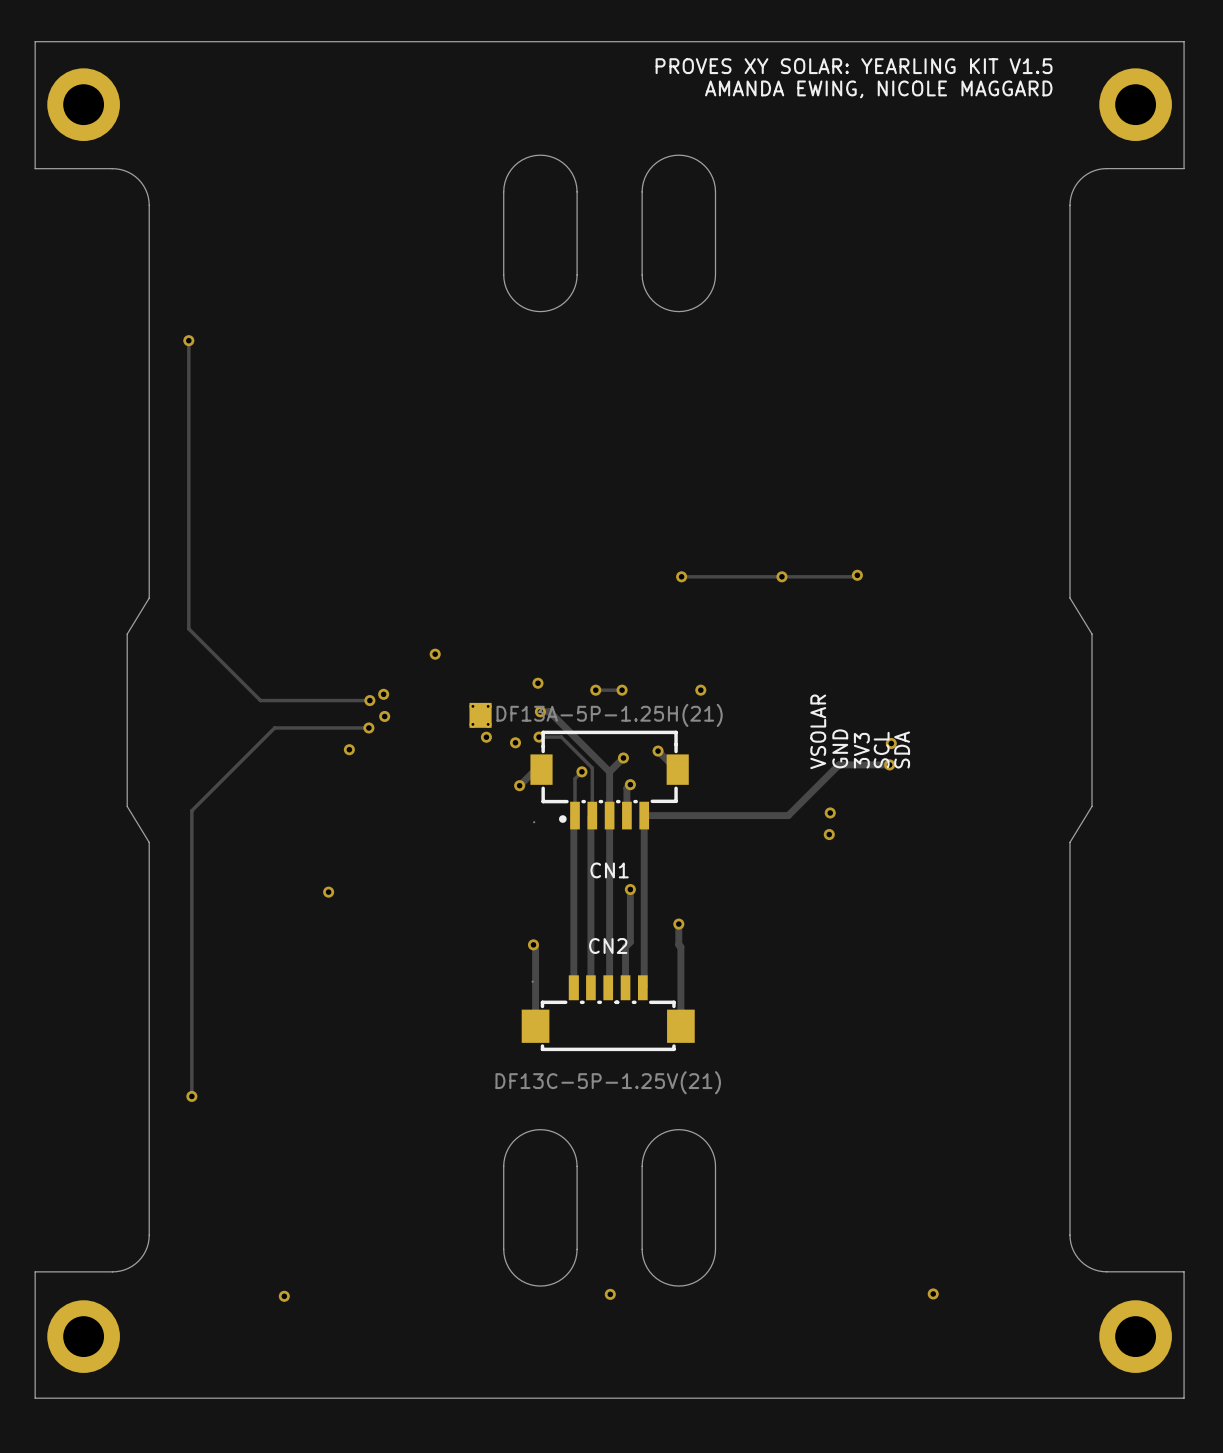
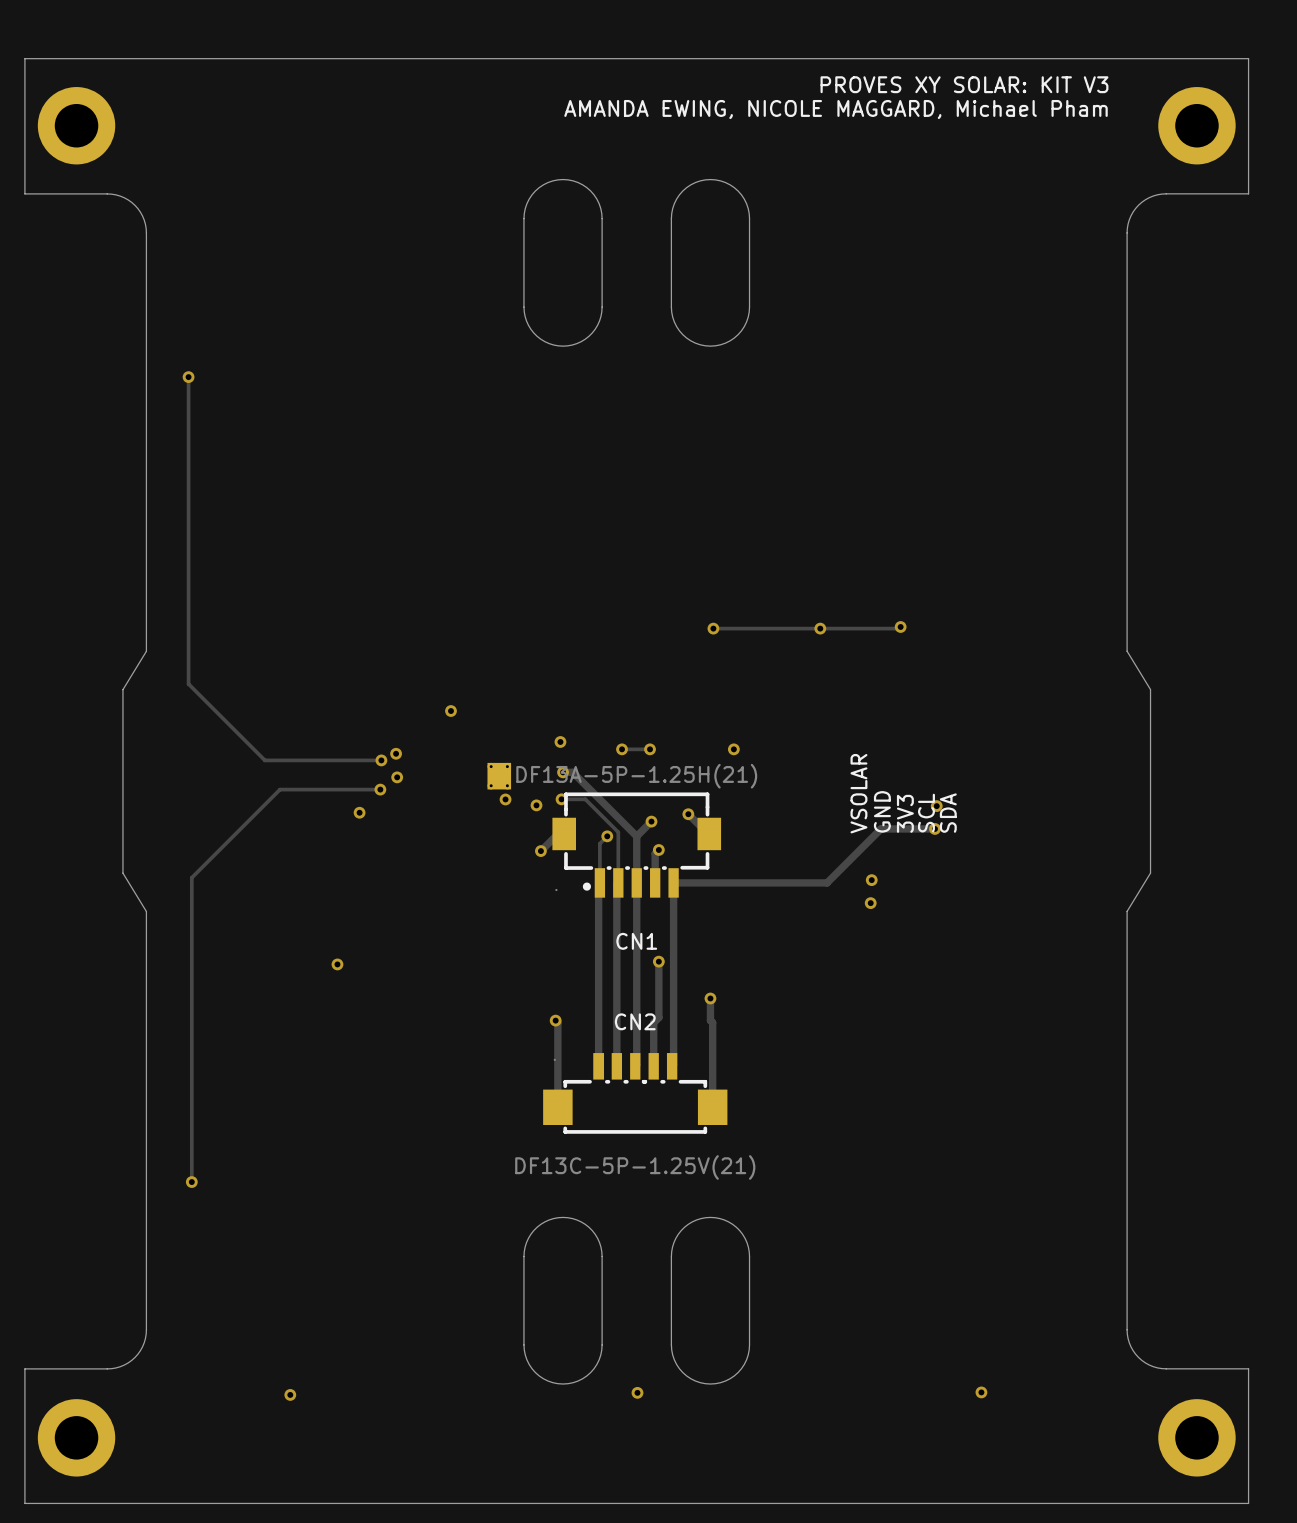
text: PROVES XY SOLAR: YEARLING KIT V1.5 (854, 66) -> PROVES XY SOLAR: KIT V3 (964, 84)
text: AMANDA EWING, NICOLE MAGGARD (878, 89) -> AMANDA EWING, NICOLE MAGGARD, Michael Pham (836, 109)

